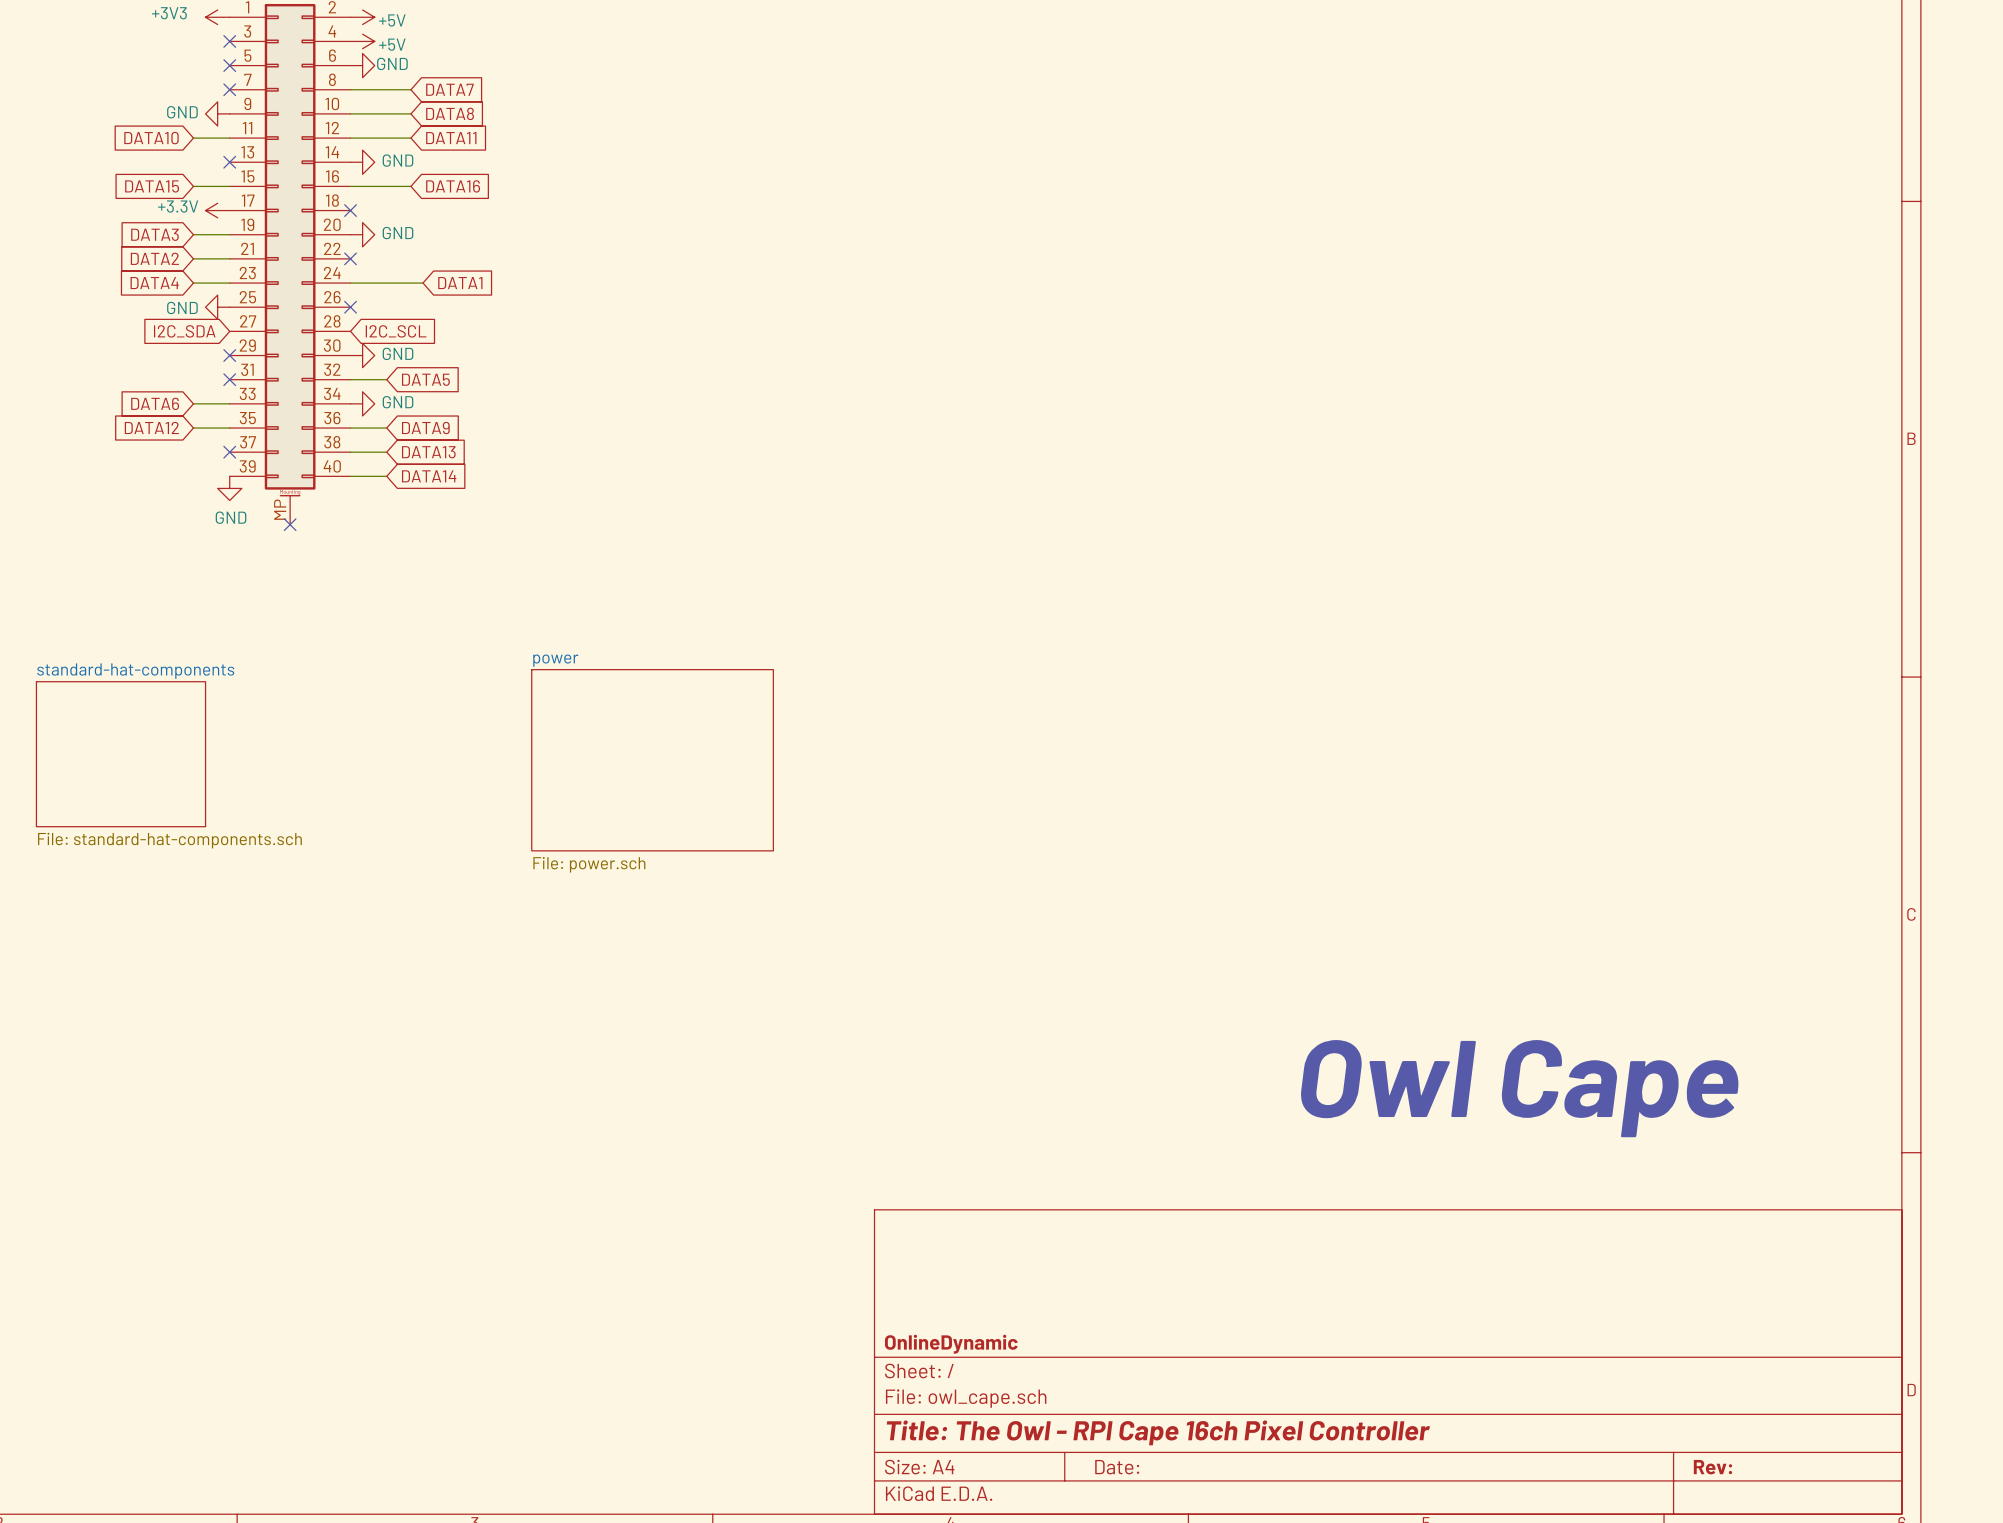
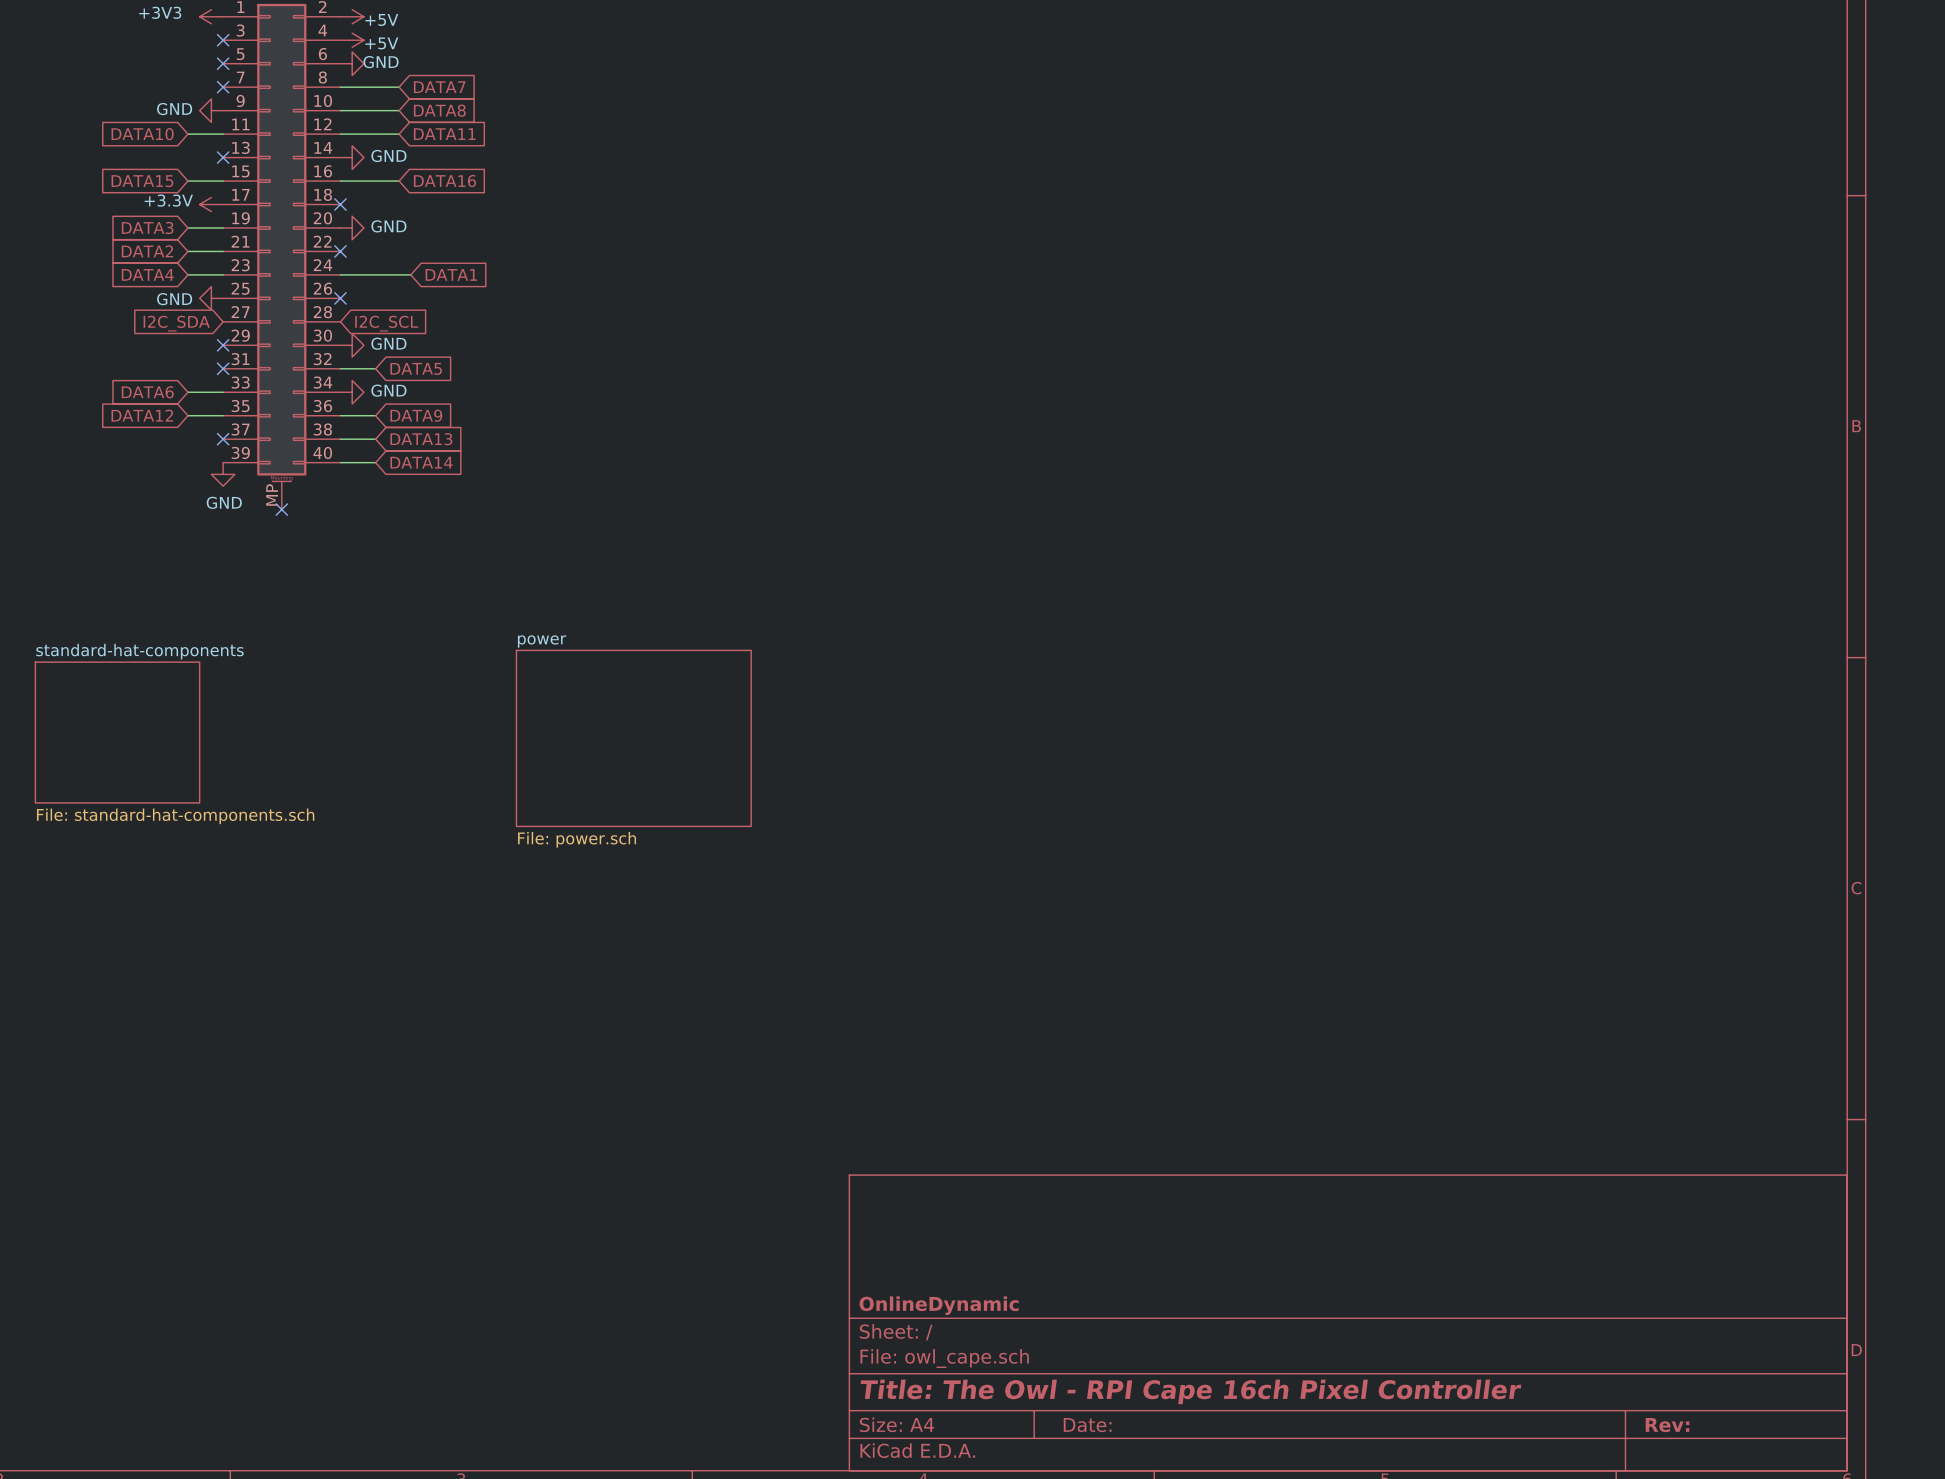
text: Owl Cape (1519, 1088) -> none

